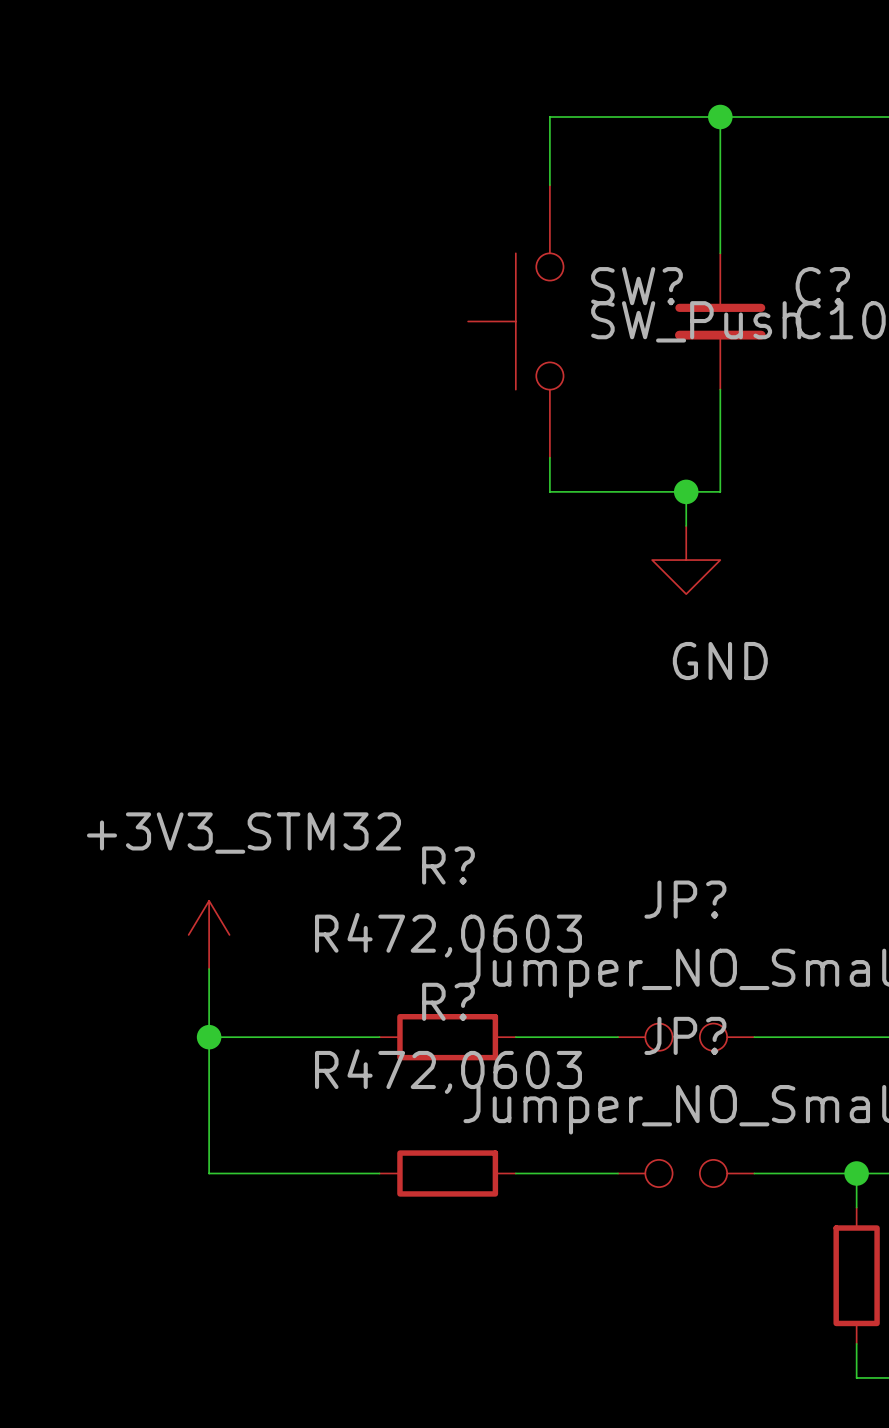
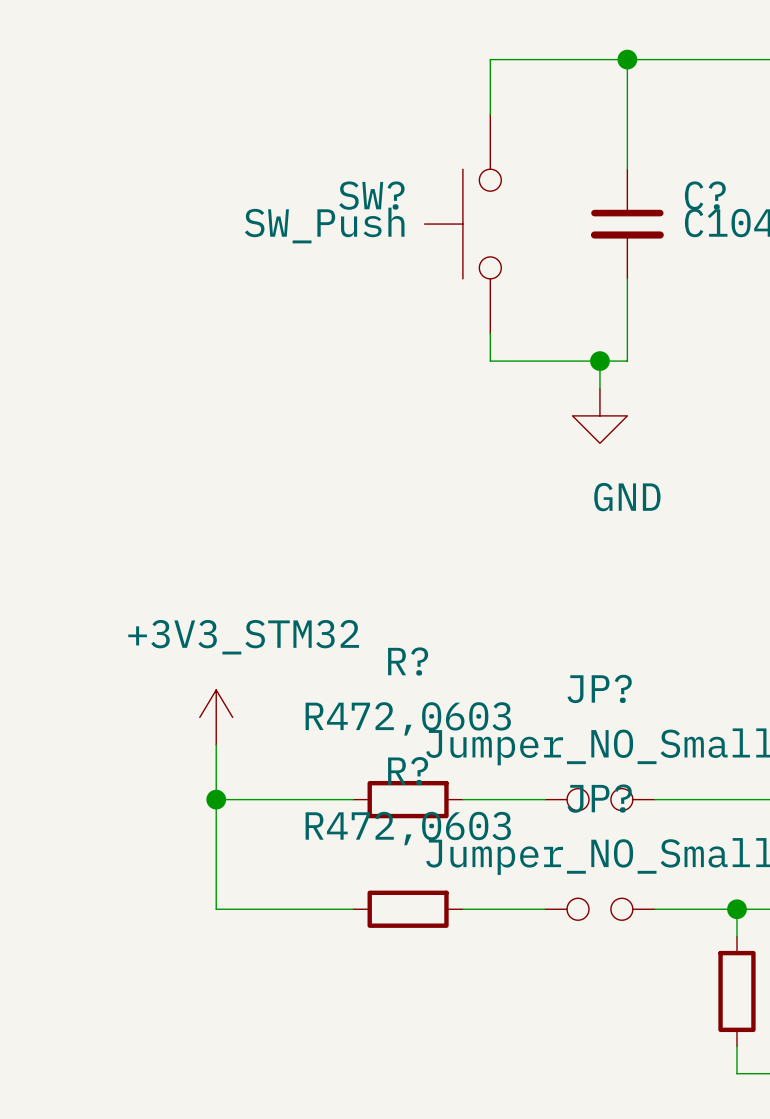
SW? name position: SW? (636, 286) -> SW? (371, 195)
SW? value position: SW_Push (696, 321) -> SW_Push (324, 225)

